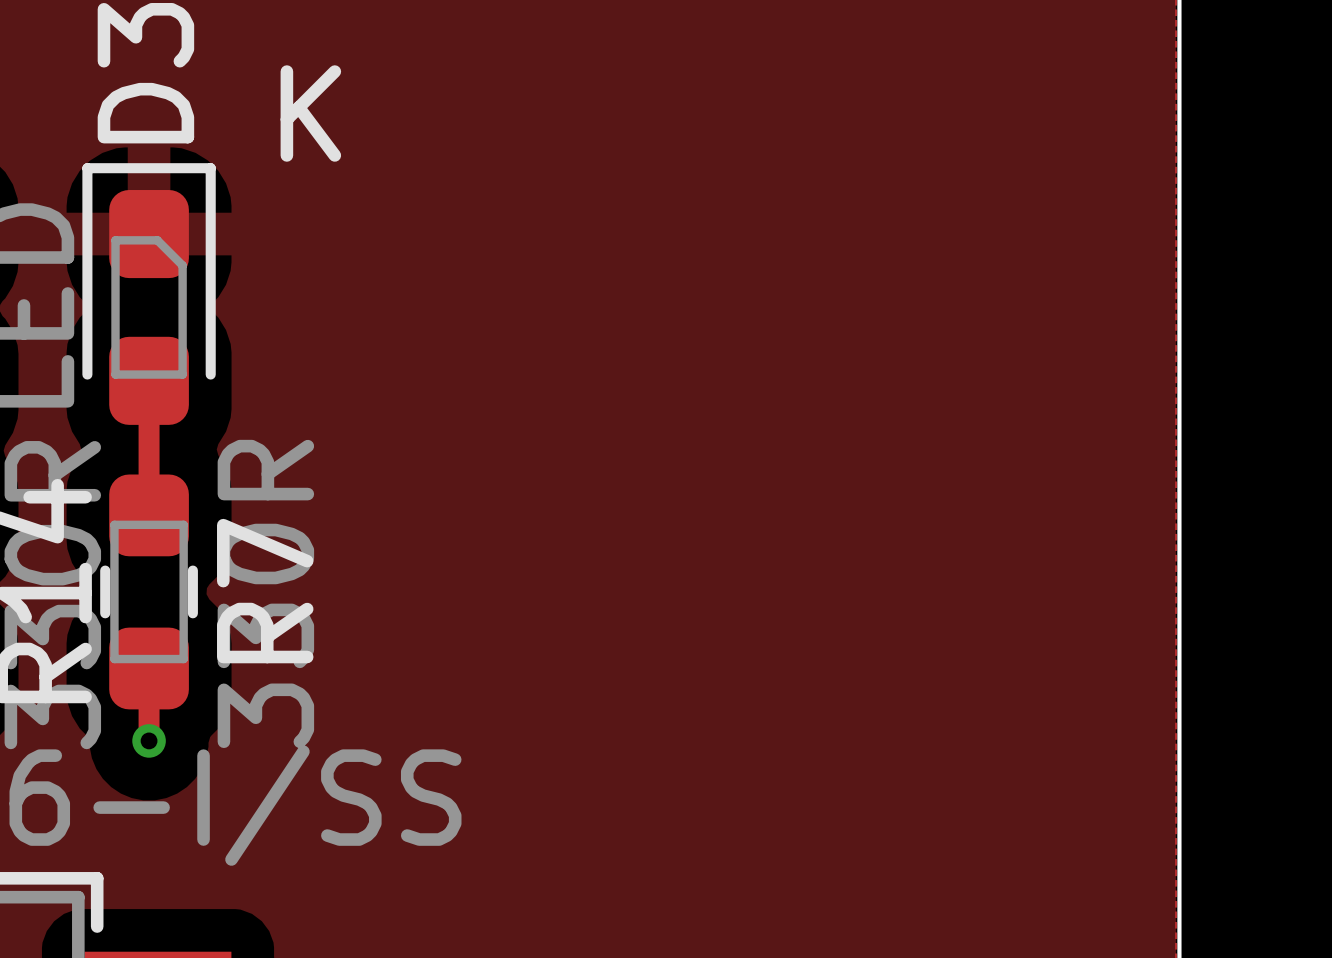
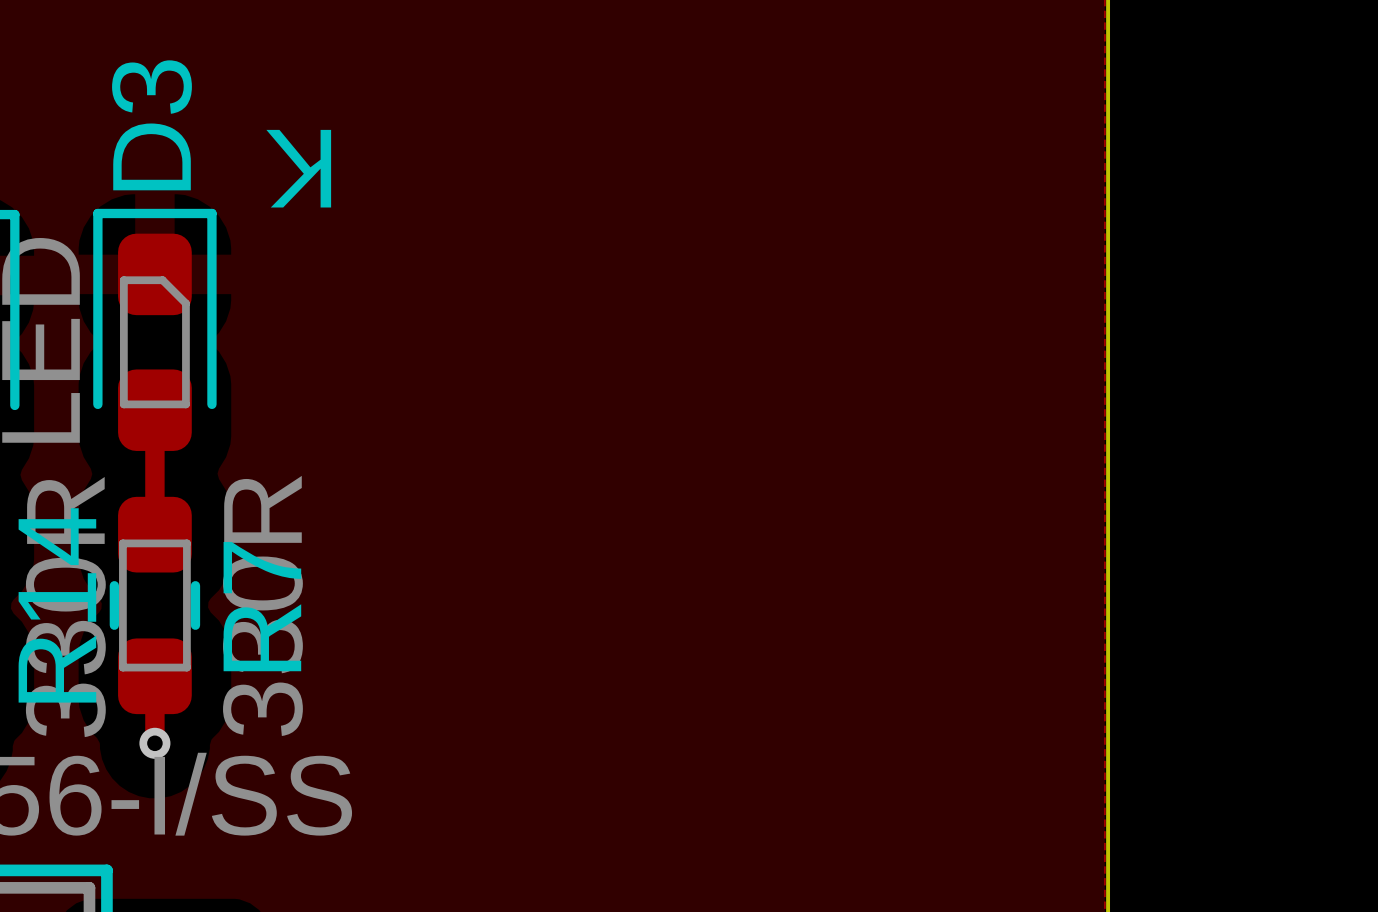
text rotation: 0° (310, 113) -> 180° (298, 168)

